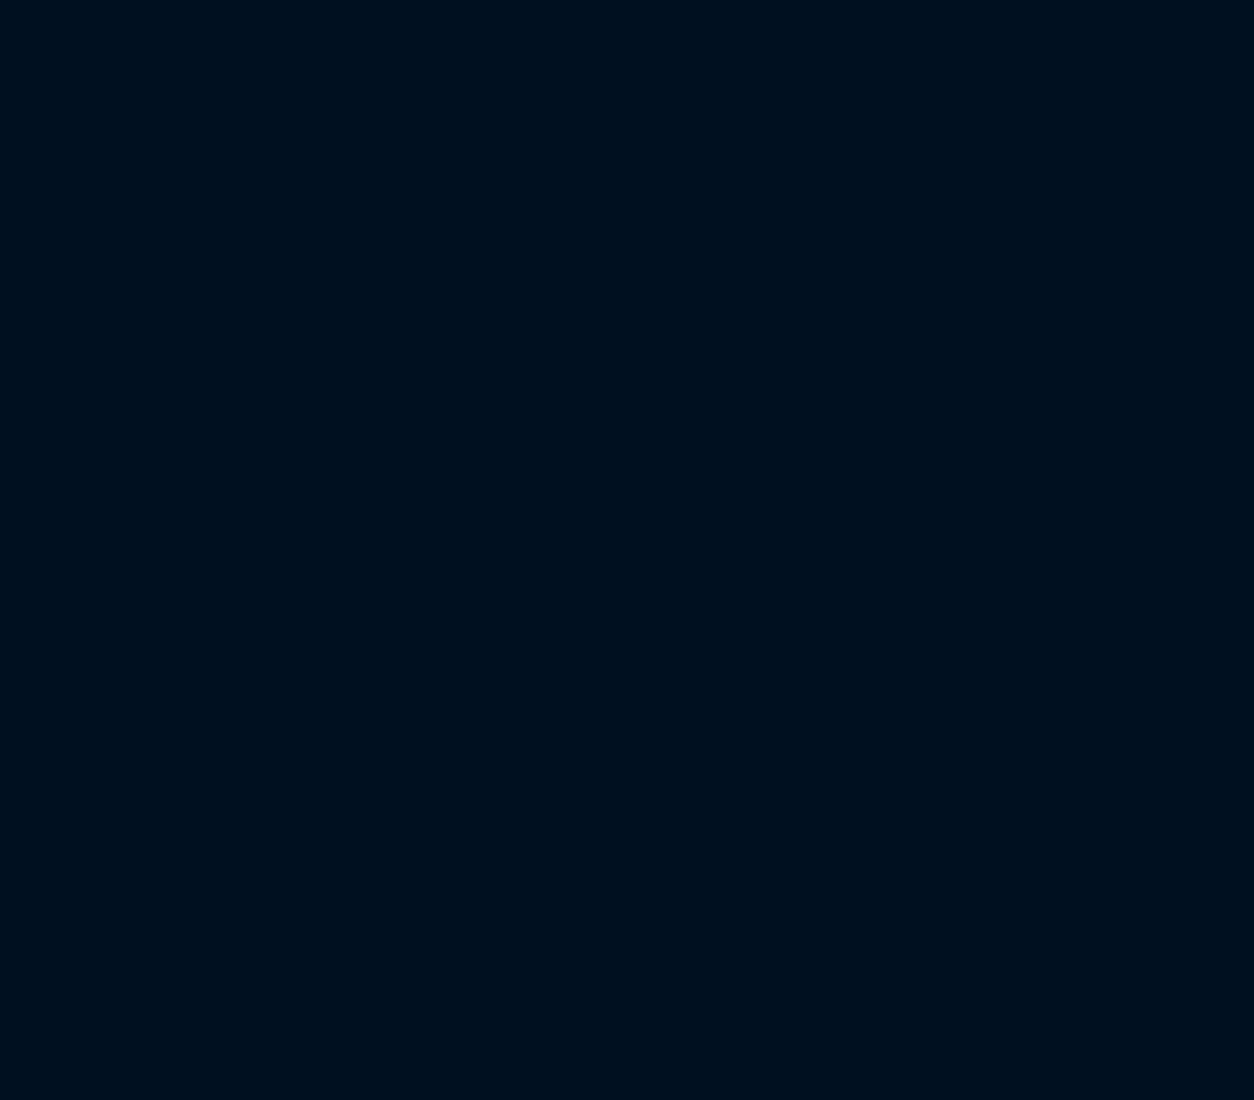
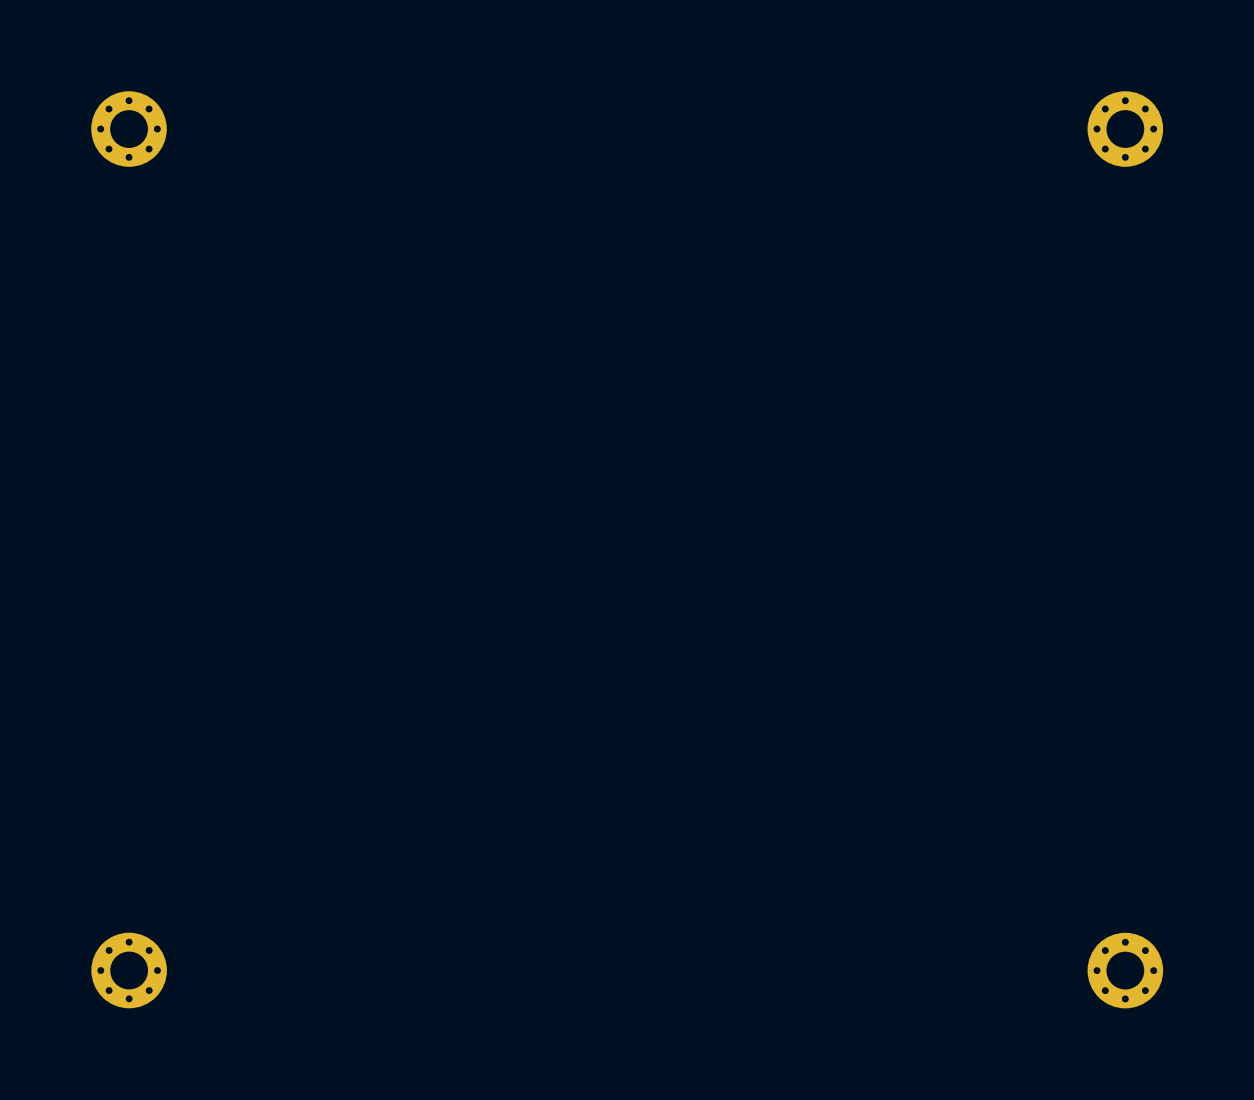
part: none -> (129, 129)
part: none -> (1125, 129)
part: none -> (129, 970)
part: none -> (1125, 970)

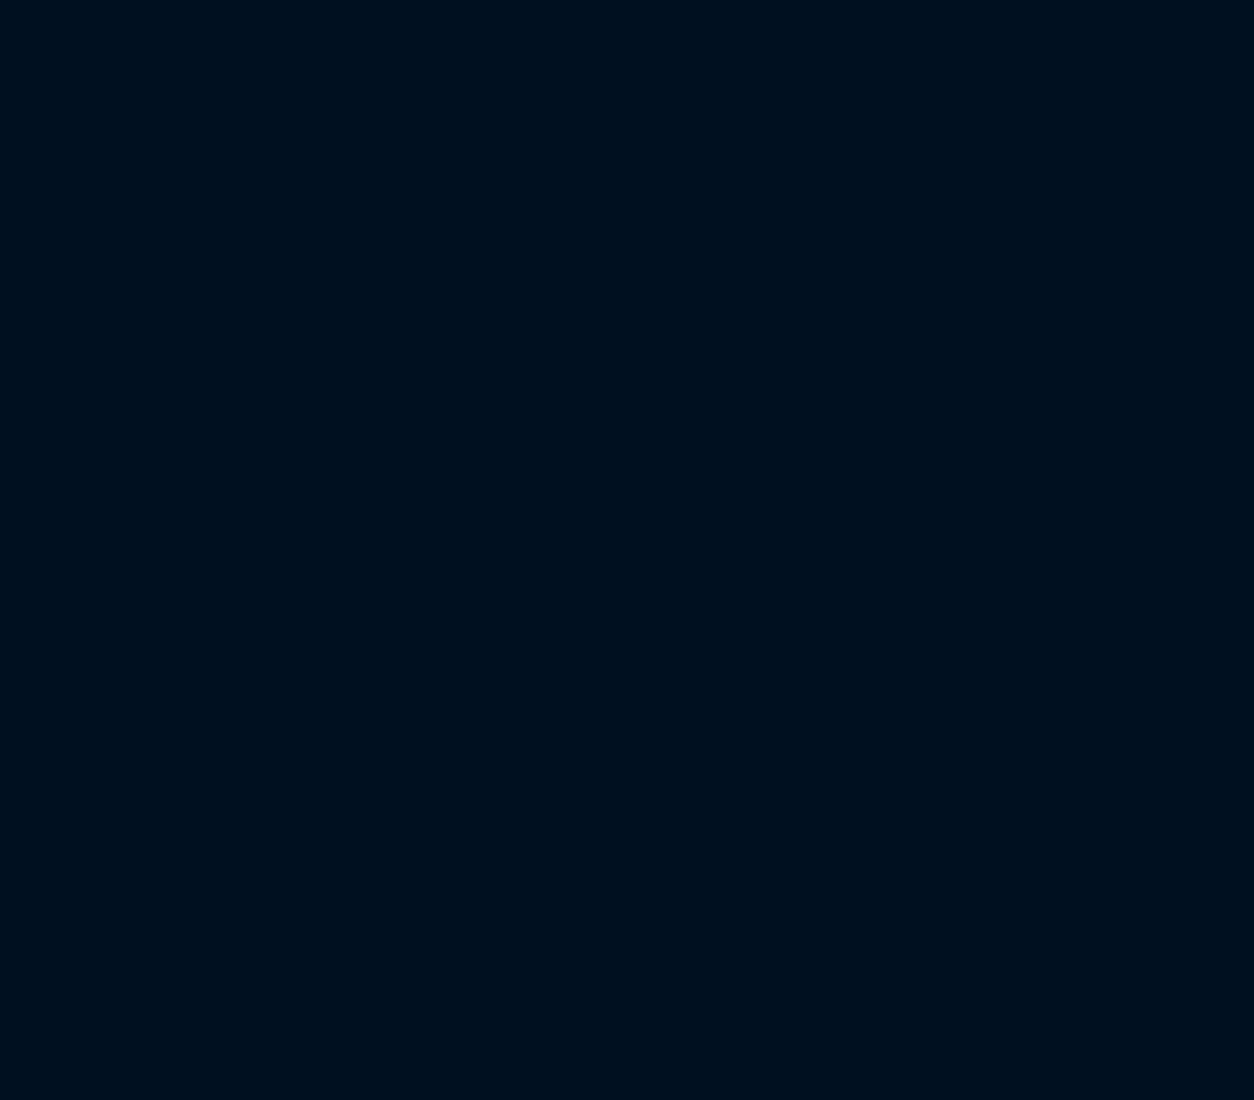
part: (129, 129) -> none
part: (1125, 129) -> none
part: (129, 970) -> none
part: (1125, 970) -> none

